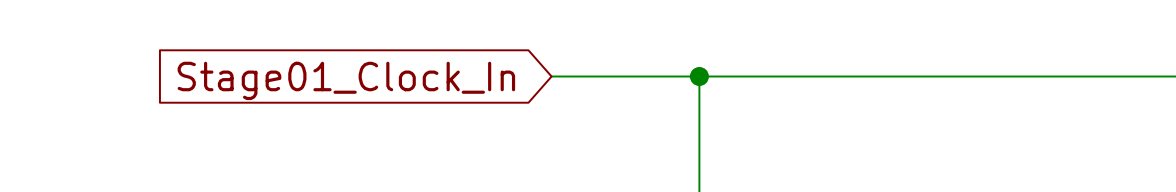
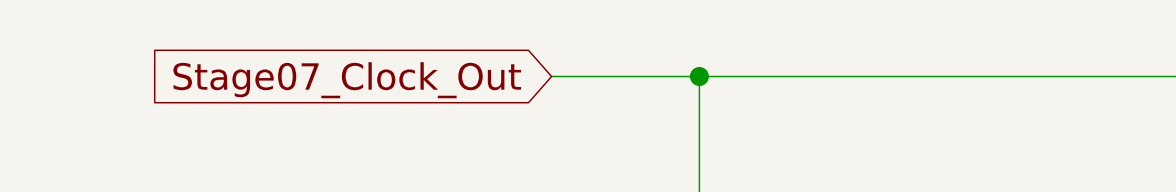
global label: Stage01_Clock_In (346, 80) -> Stage07_Clock_Out (347, 80)

